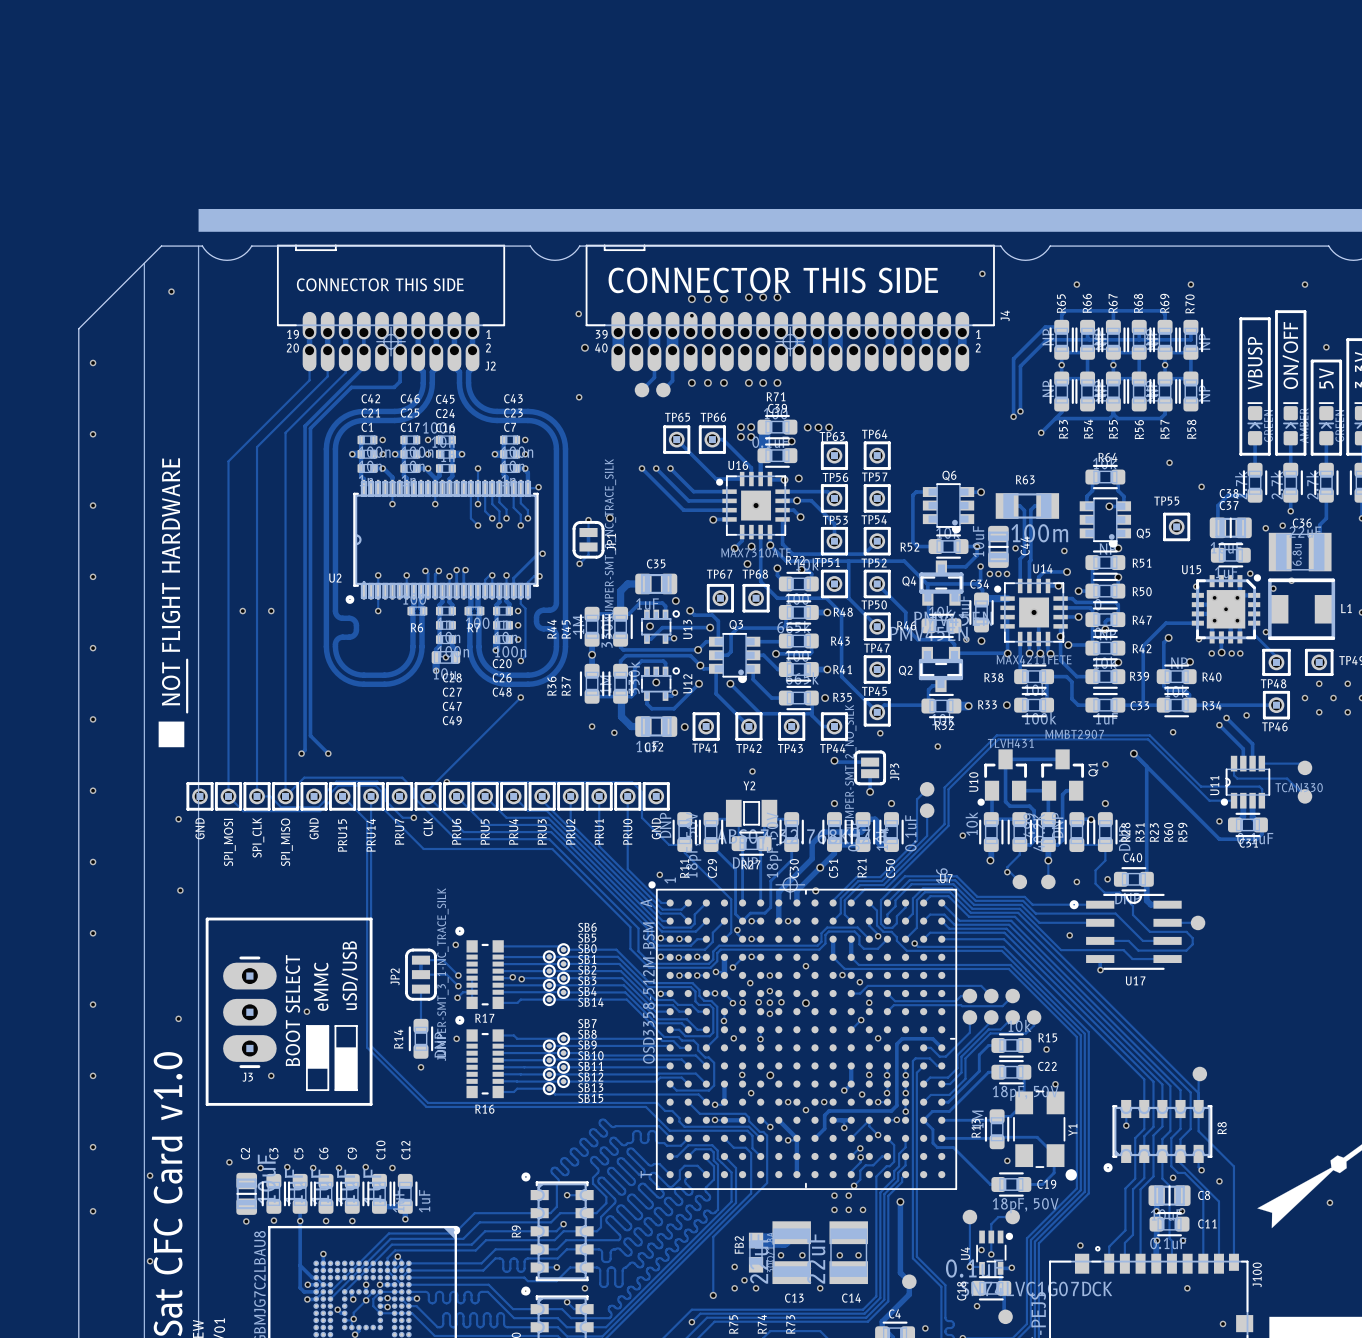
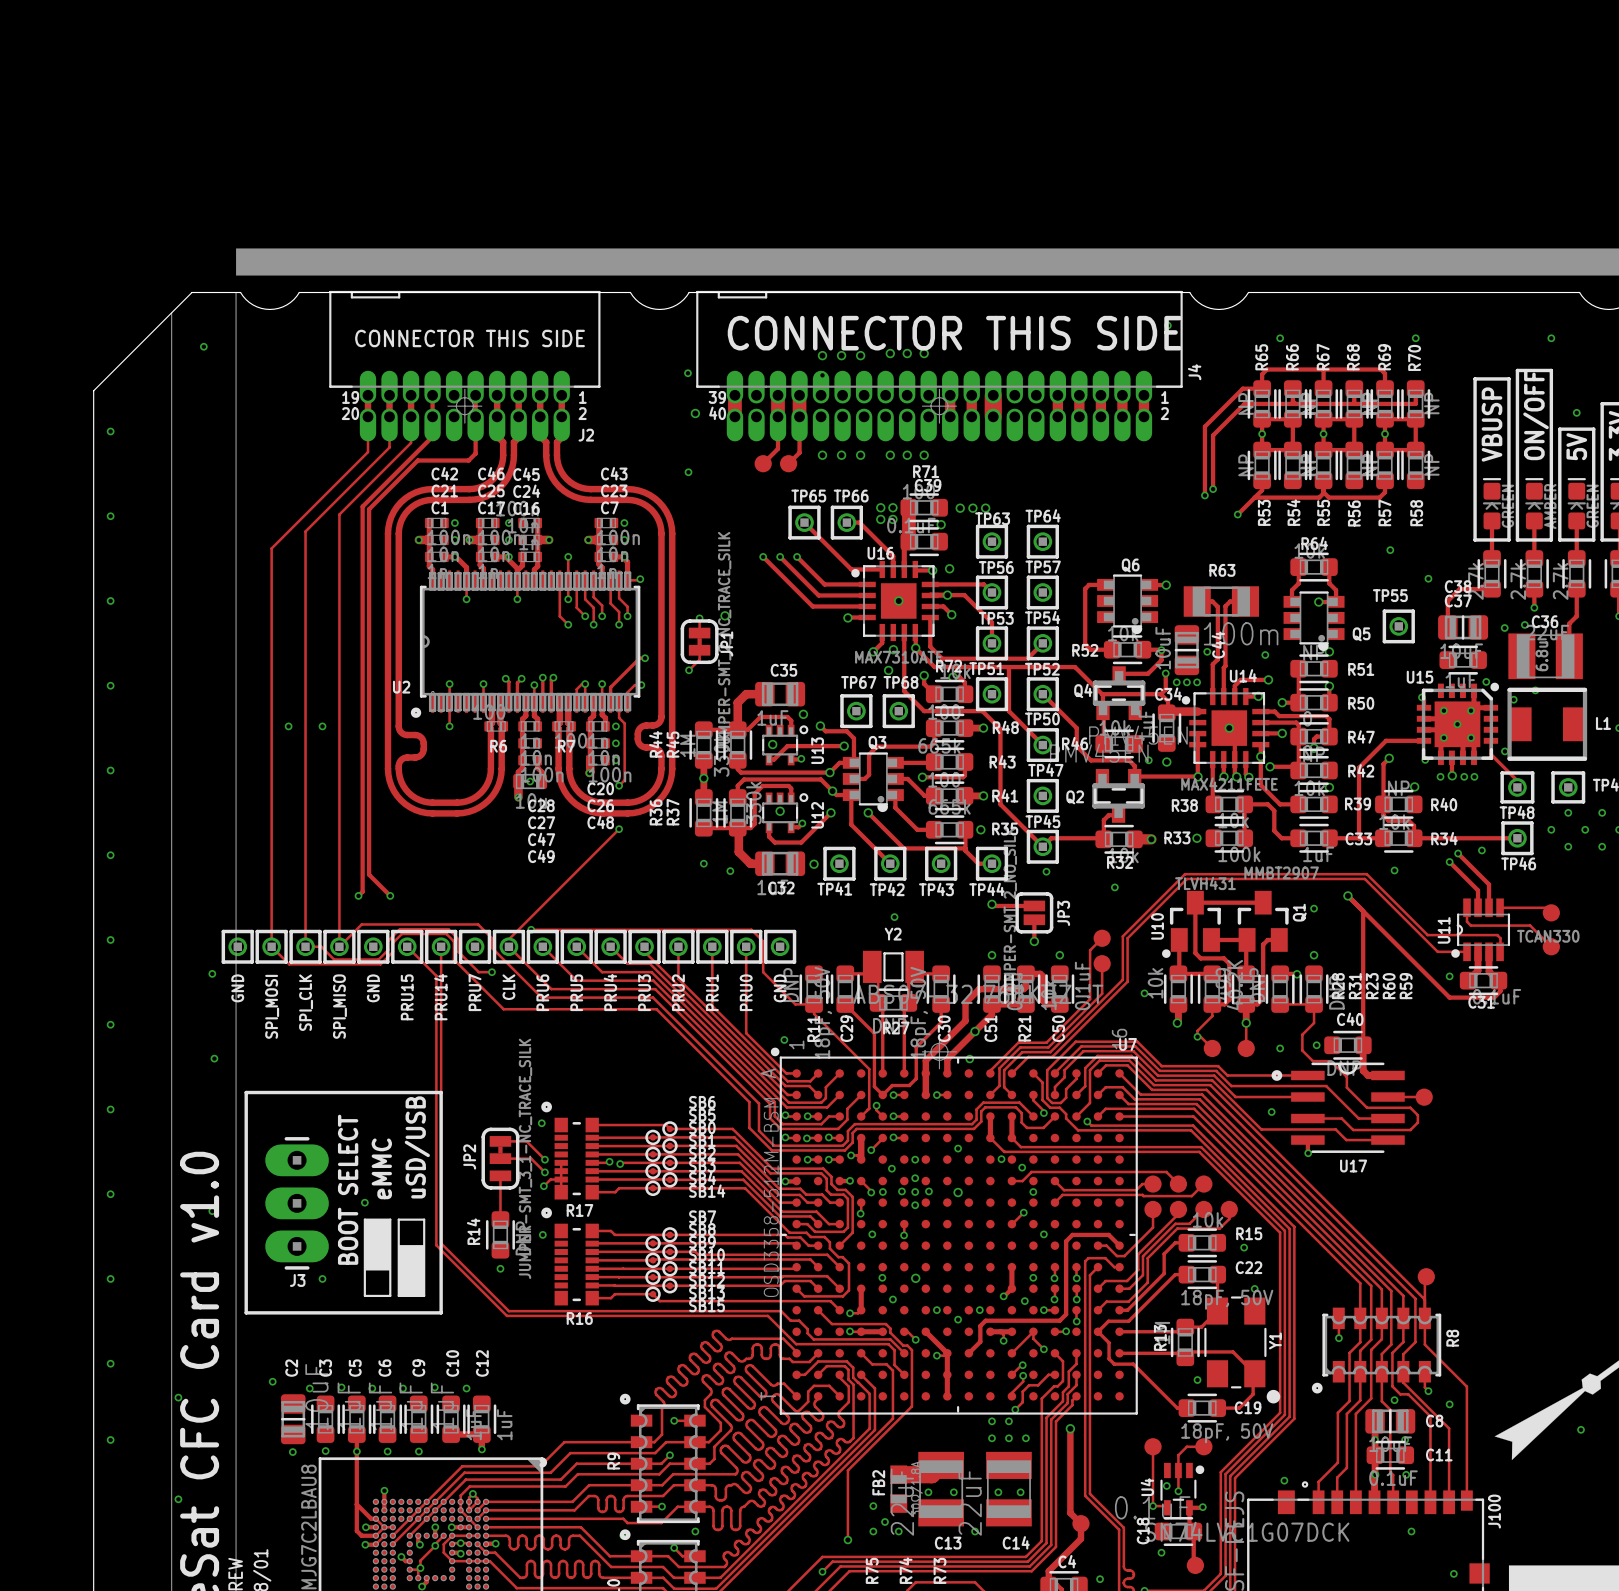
drawing: [158, 658, 189, 748] -> none

